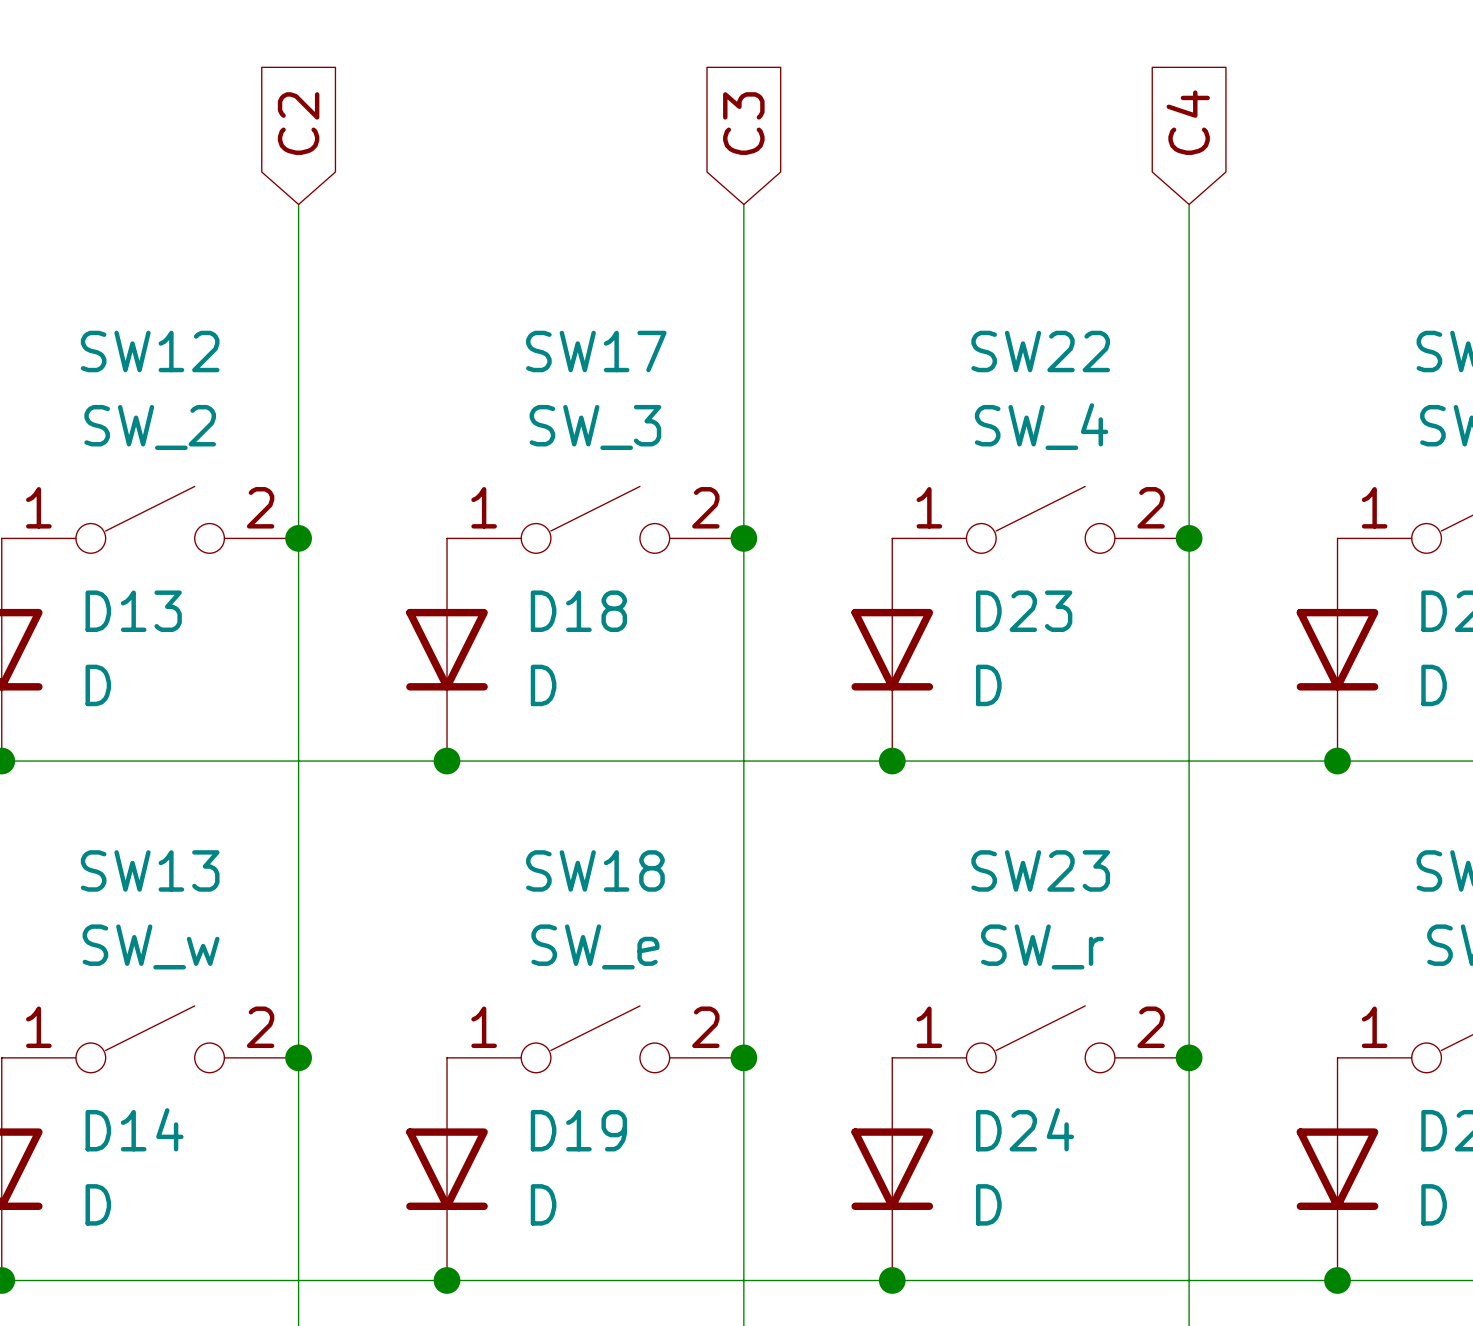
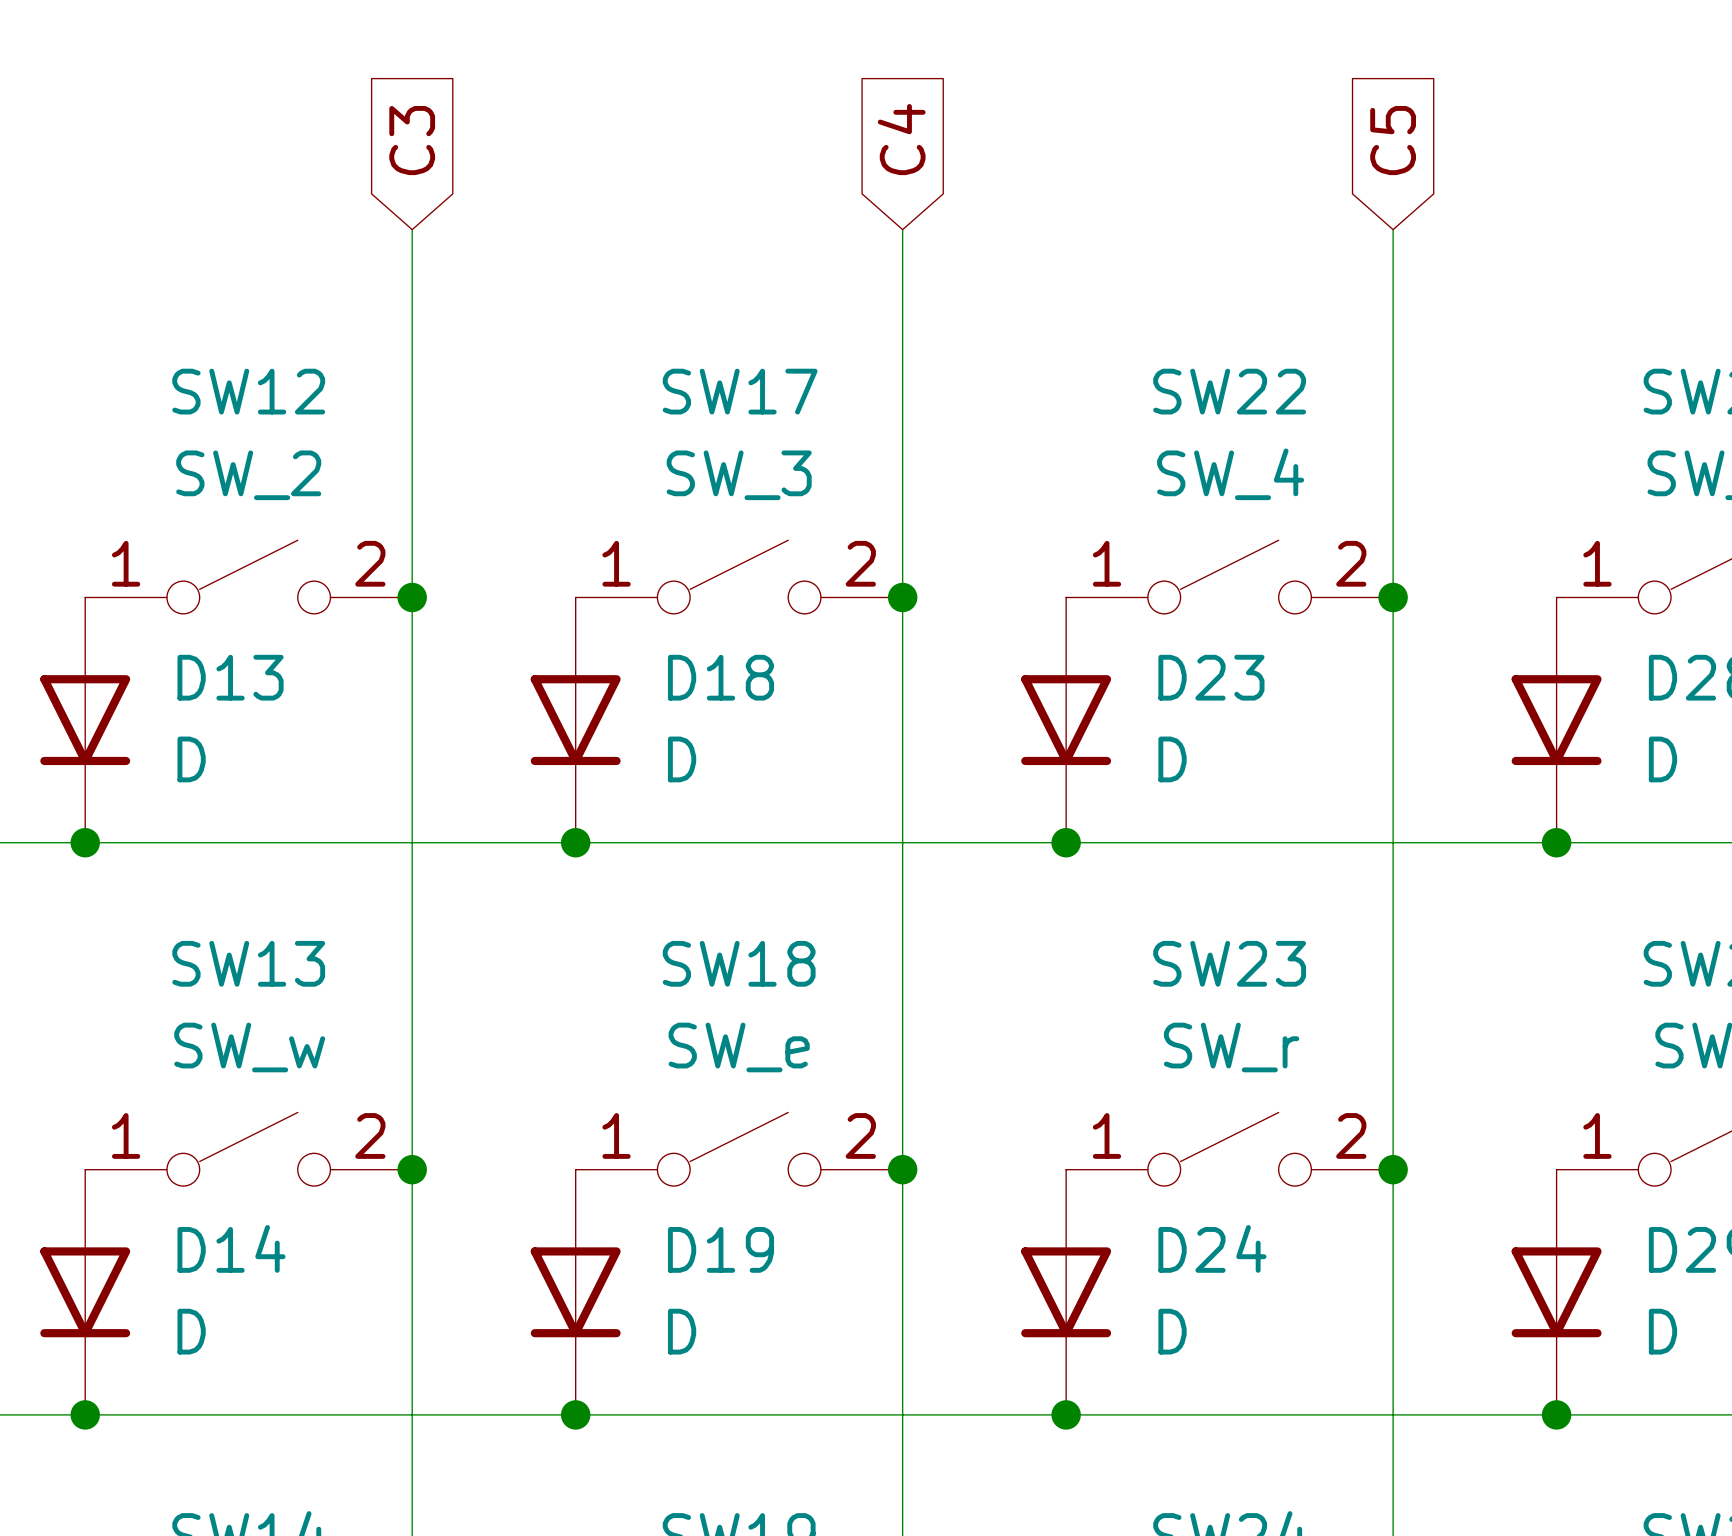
global label: C4 (1188, 122) -> C5 (1393, 140)
global label: C2 (298, 123) -> C3 (412, 140)
global label: C3 (743, 123) -> C4 (901, 139)

